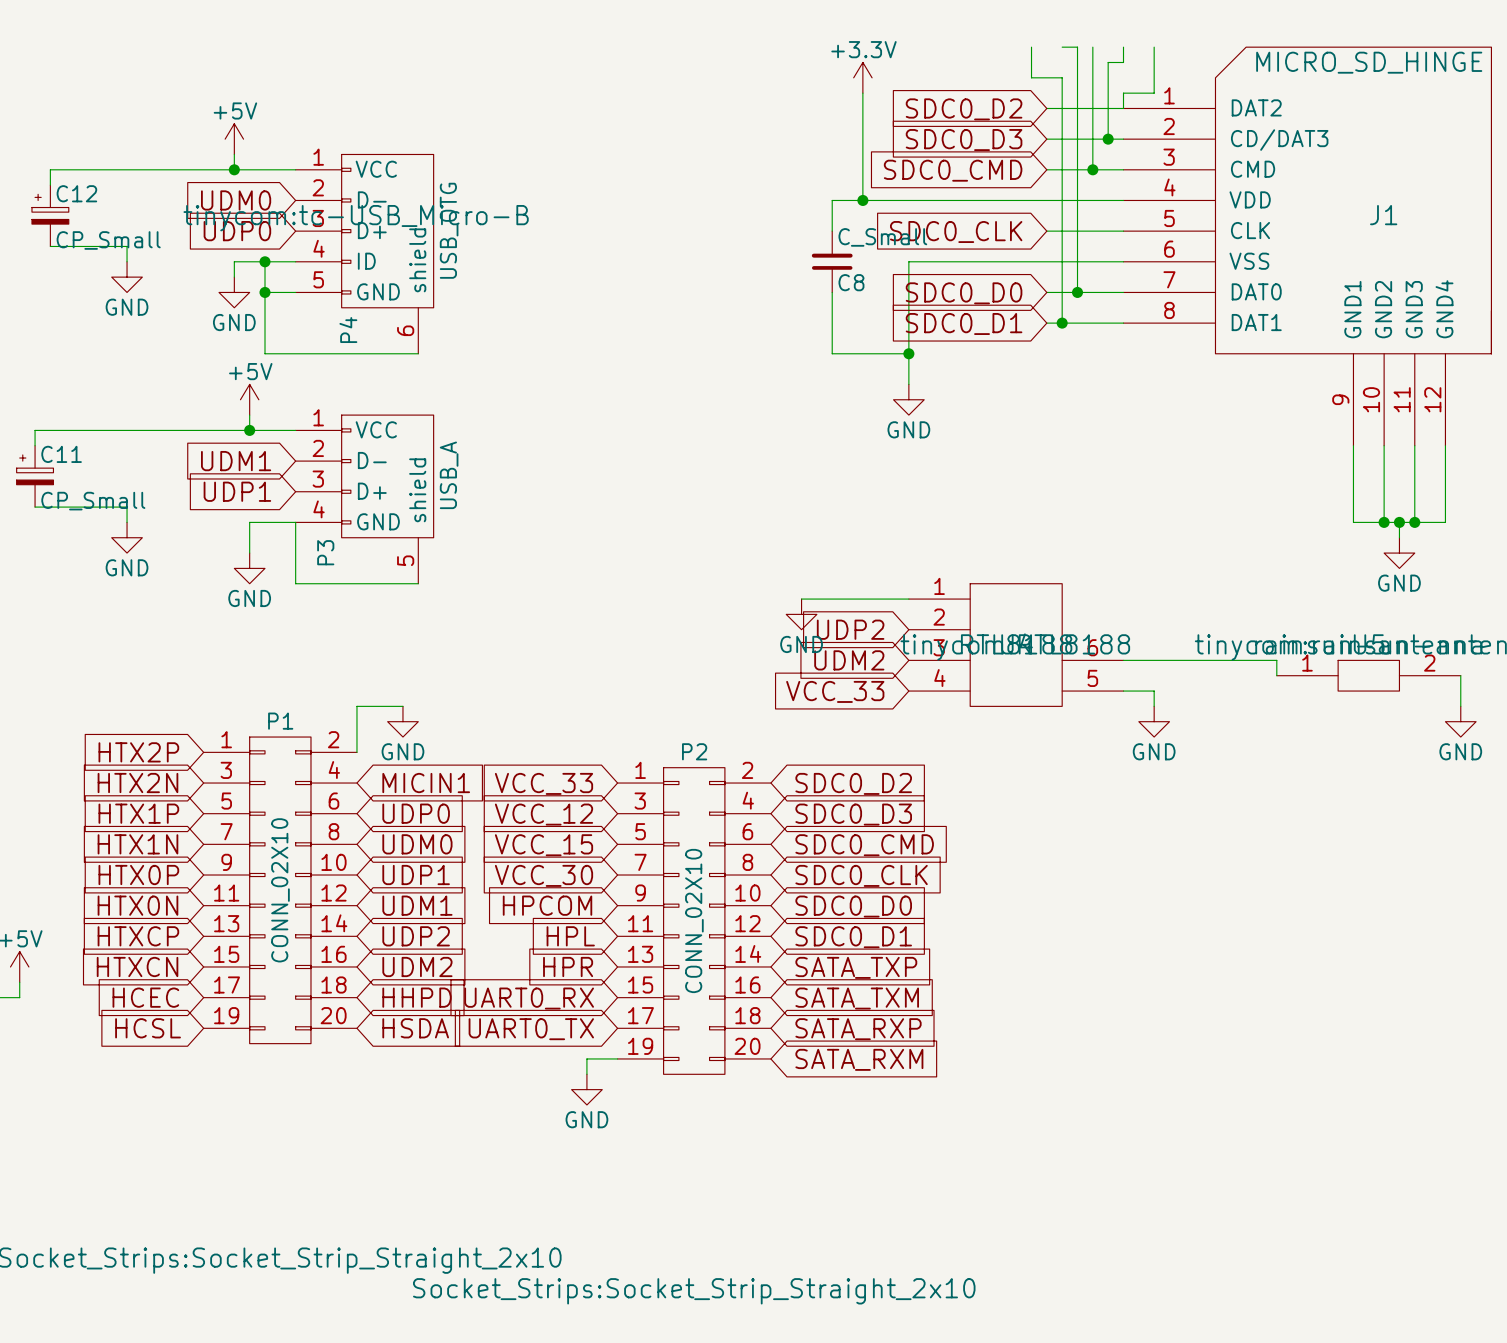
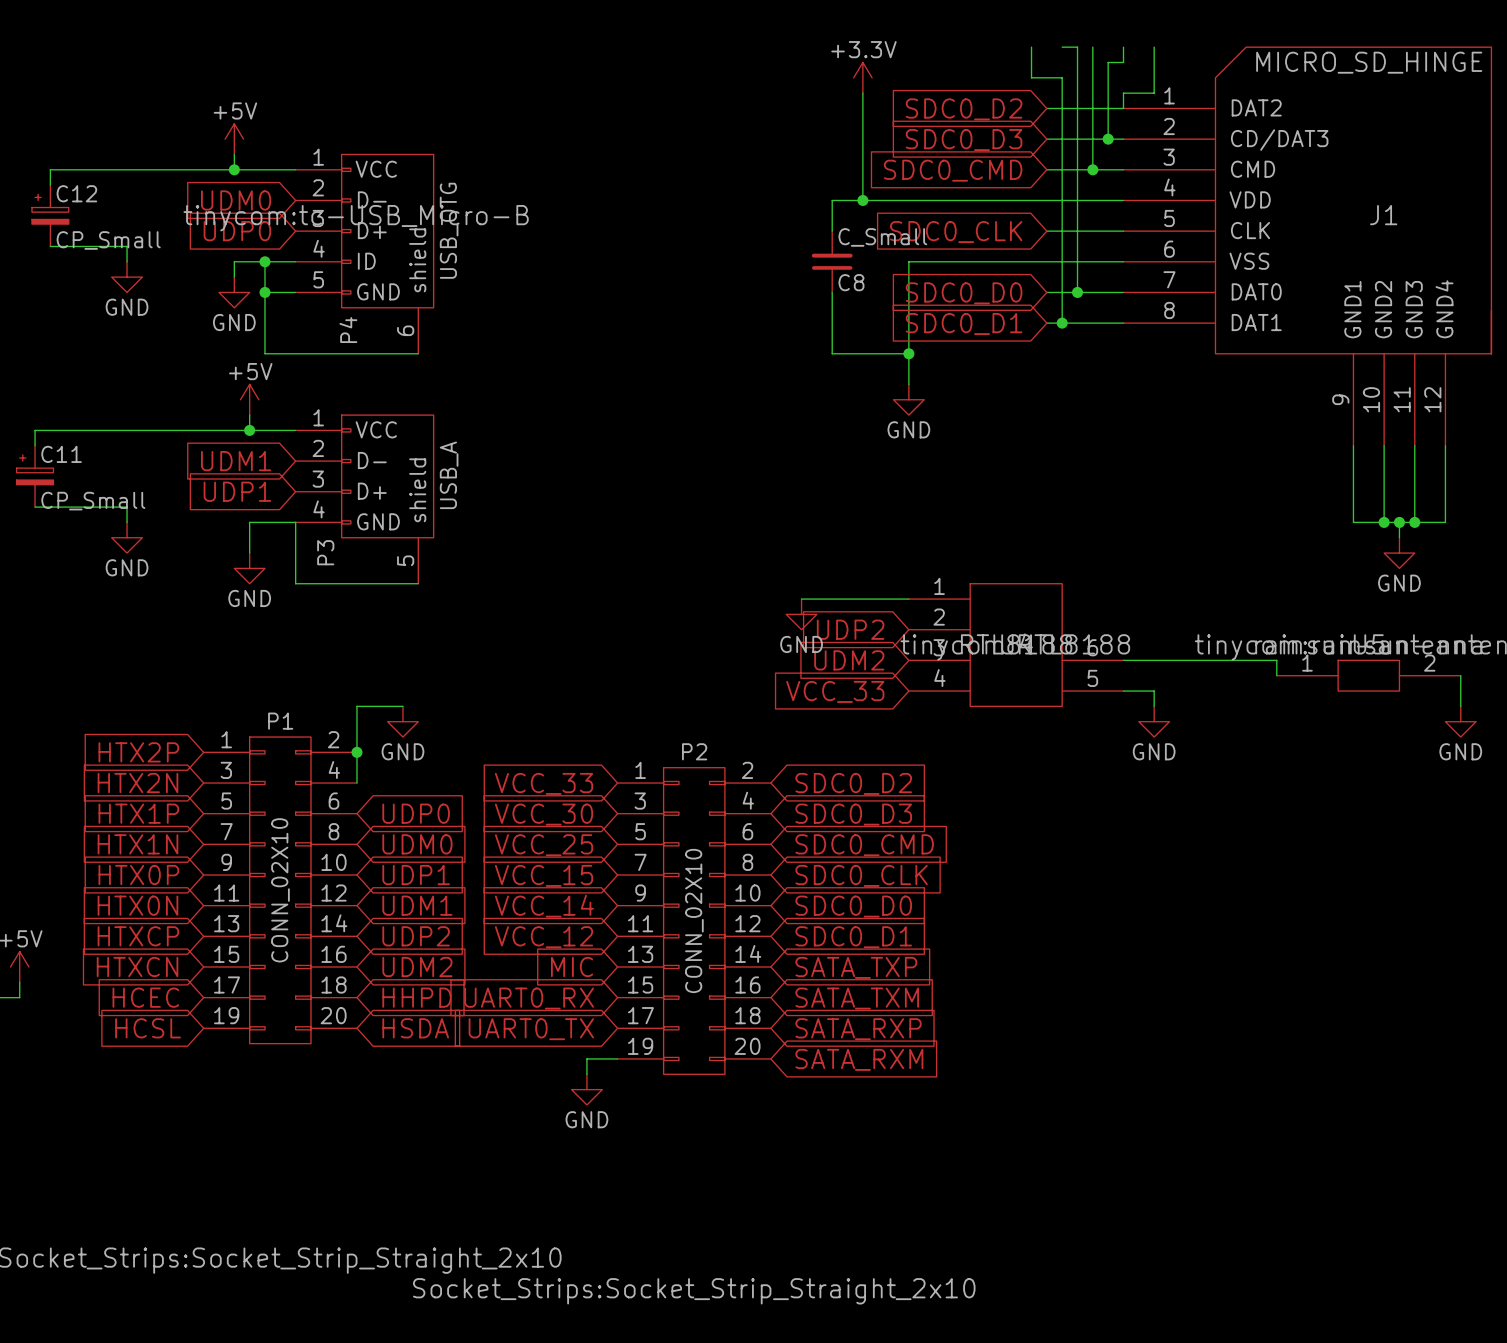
wire: none -> (356, 752) (356, 783)
junction: none -> (356, 752)
global label: MICIN1 (426, 783) -> none
global label: VCC_12 (544, 814) -> VCC_30 (544, 814)
global label: VCC_15 (544, 845) -> VCC_25 (544, 845)
global label: VCC_30 (544, 875) -> VCC_15 (544, 875)
global label: HPCOM (547, 905) -> VCC_14 (544, 906)
global label: HPL (570, 936) -> VCC_12 (544, 937)
global label: HPR (568, 966) -> MIC (572, 966)

